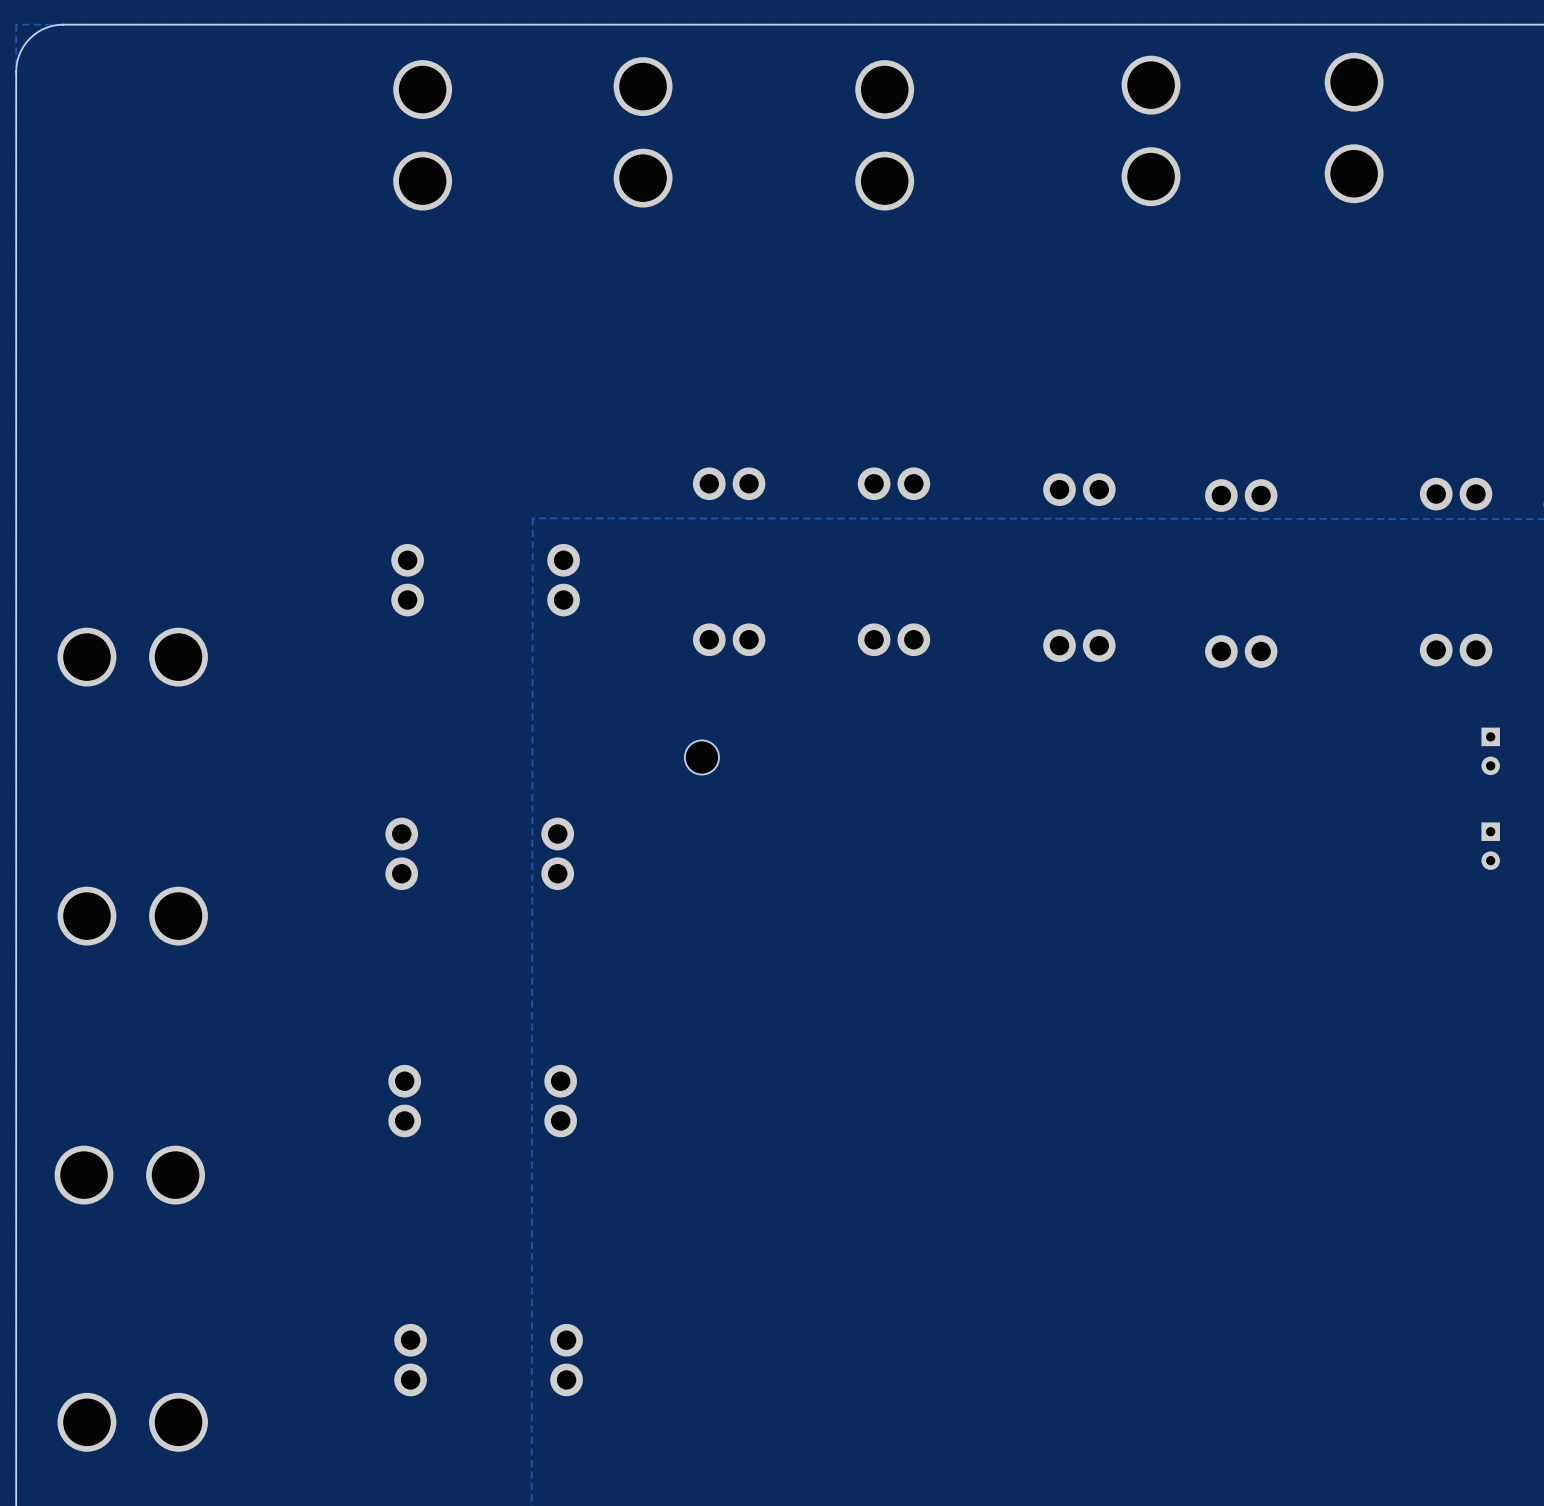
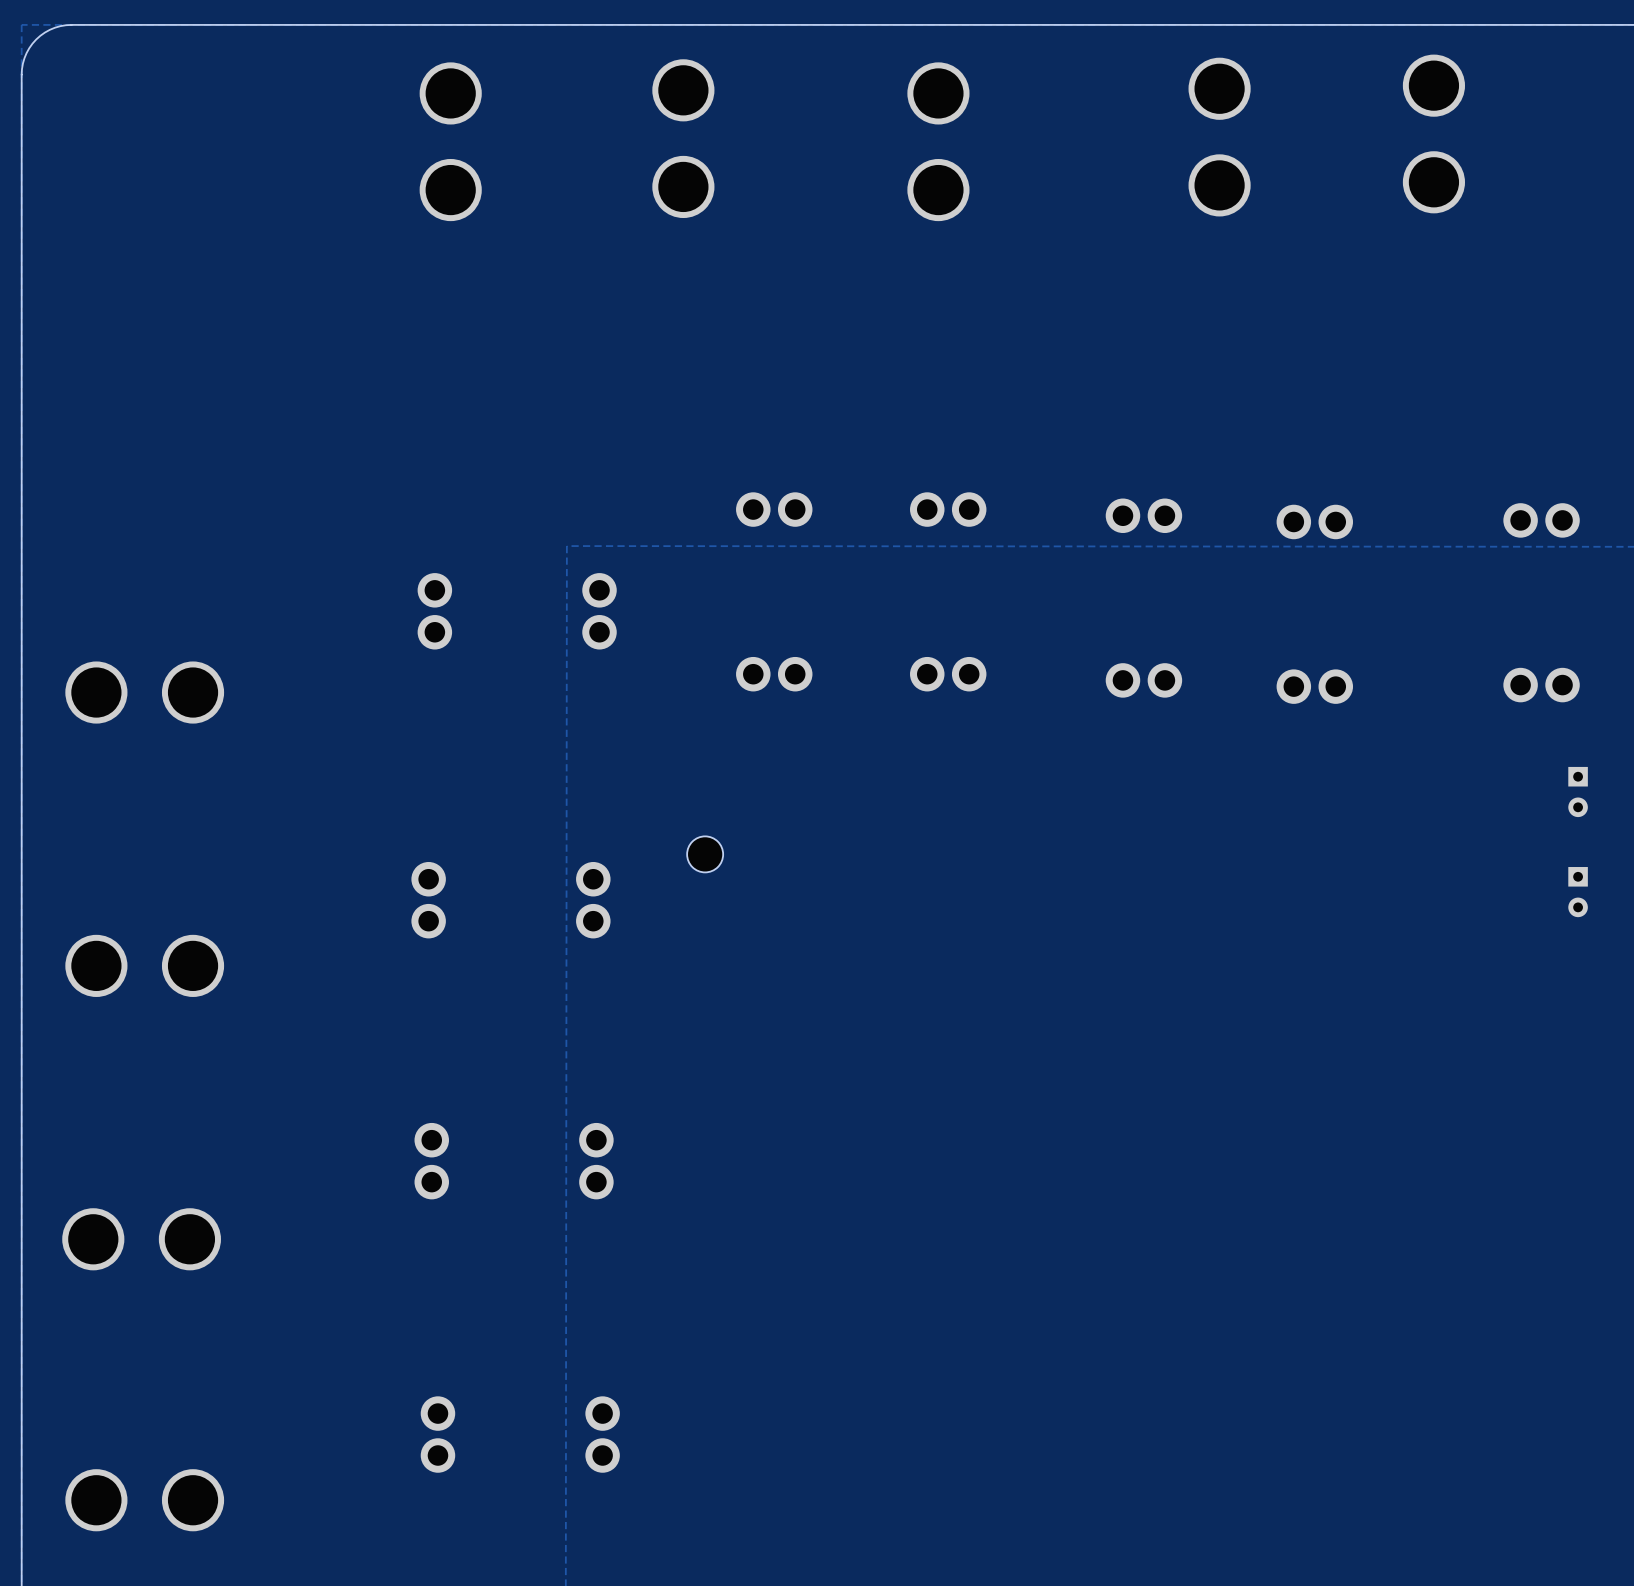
part position: (701, 757) -> (705, 854)

